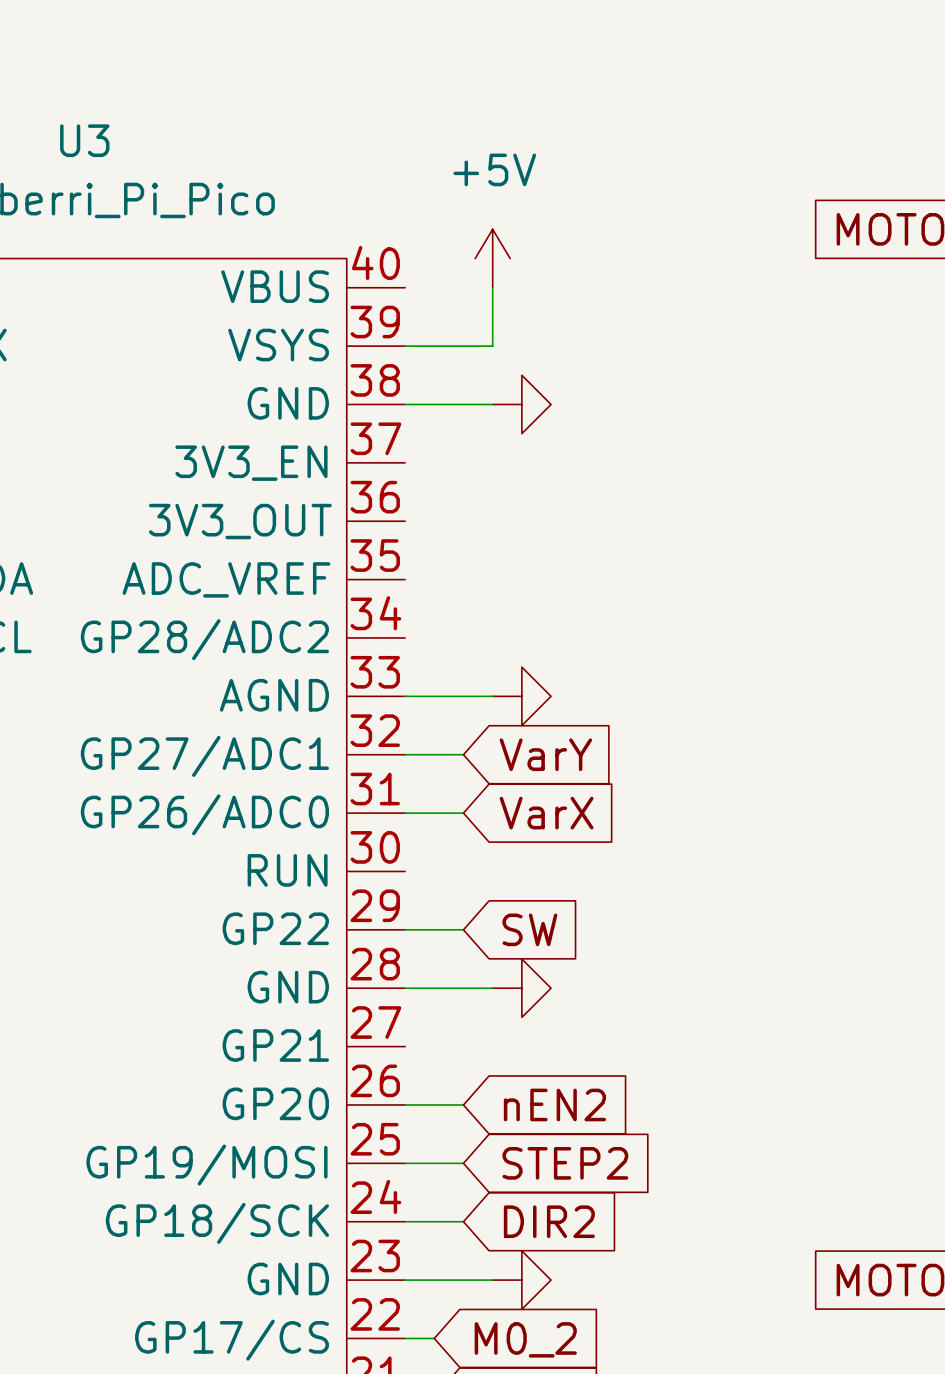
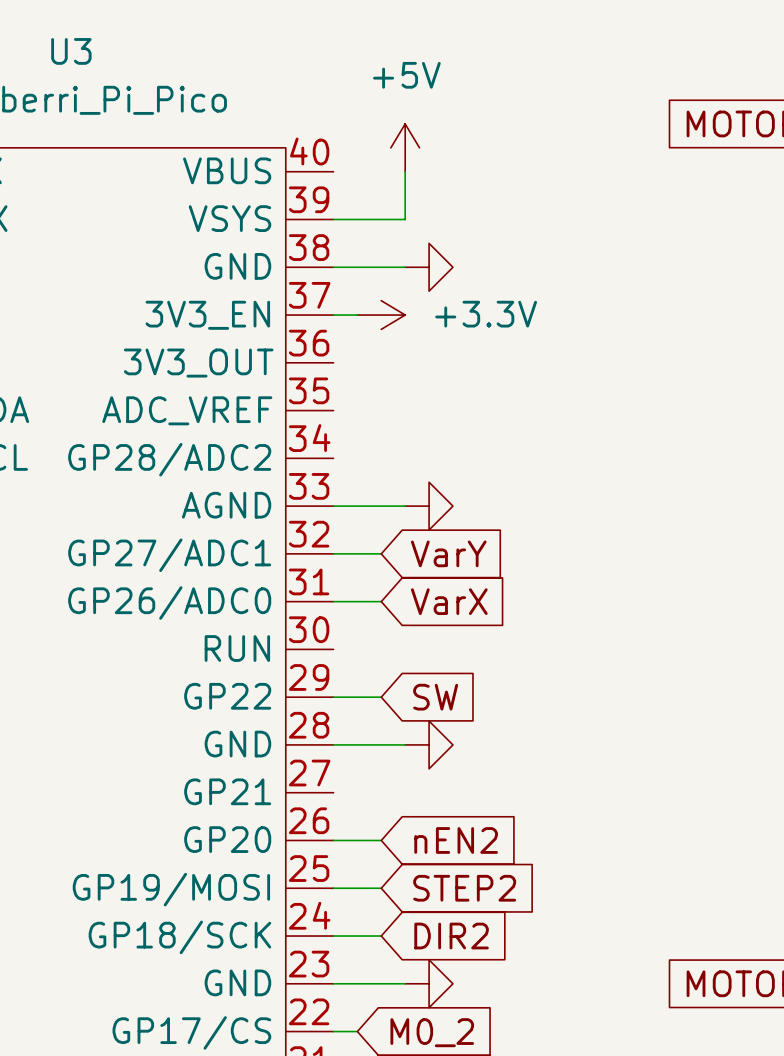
wire: none -> (333, 315) (357, 315)
power symbol: none -> +3.3V (381, 315)

